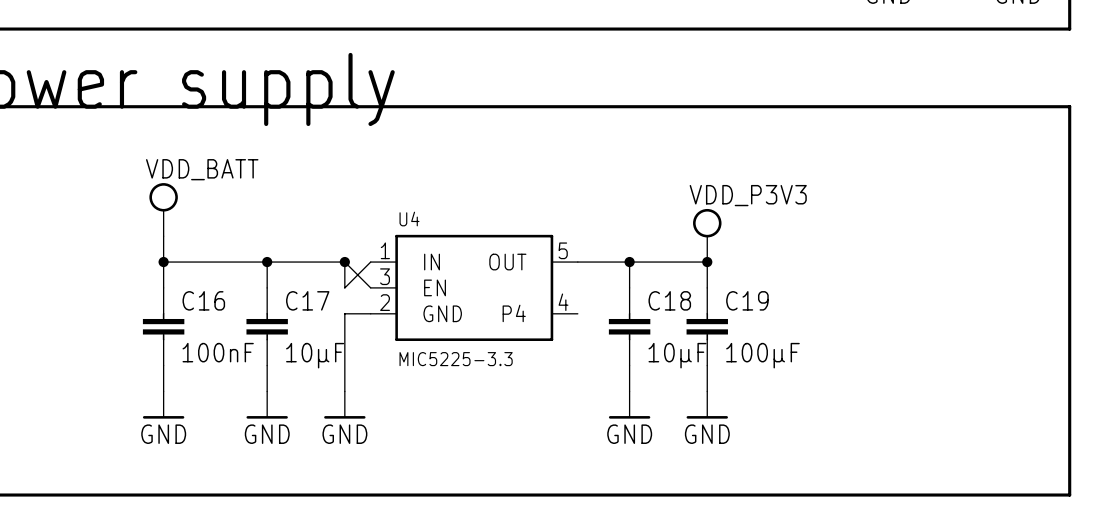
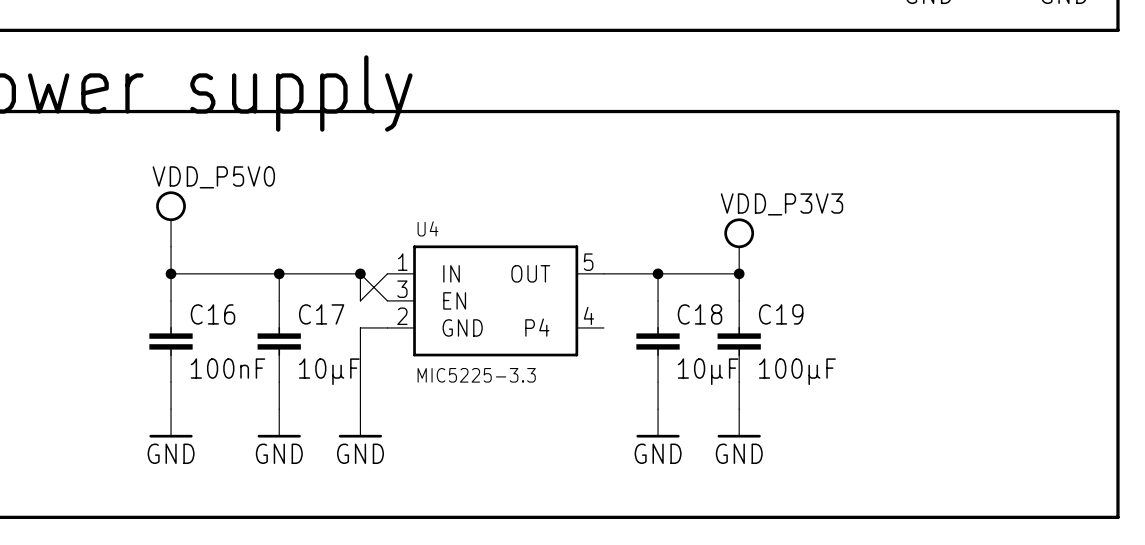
power symbol: VDD_BATT (163, 209) -> VDD_P5V0 (171, 219)

